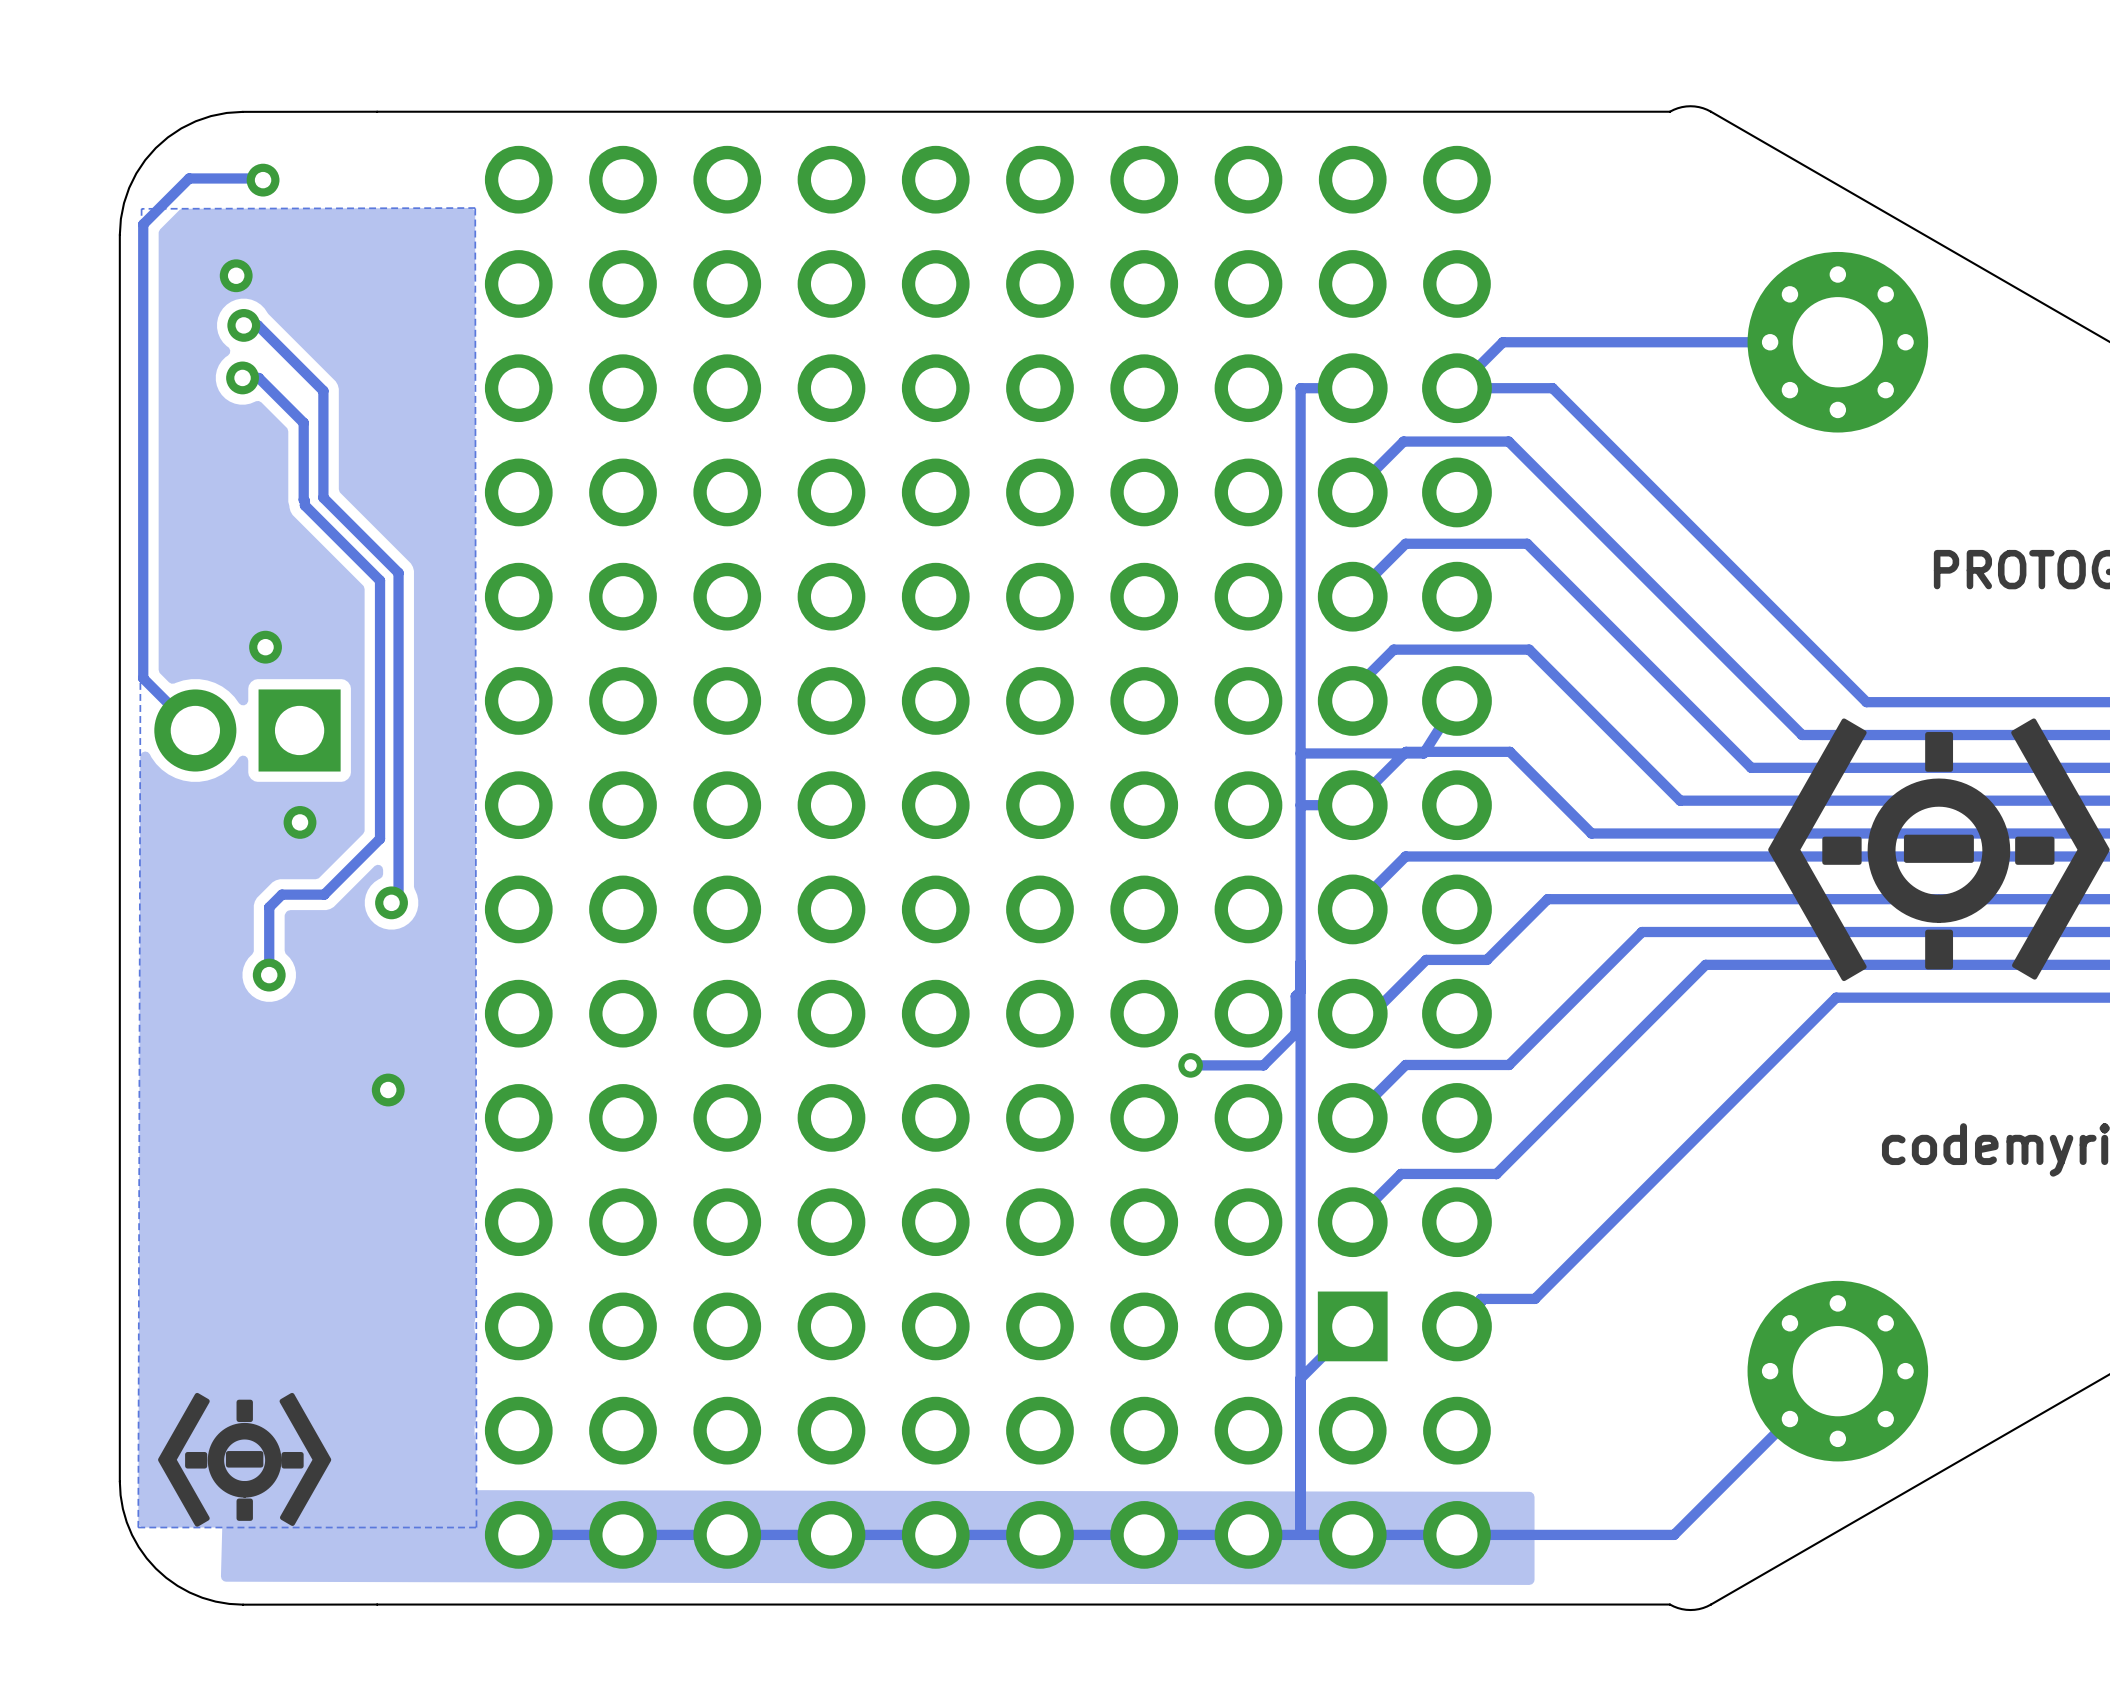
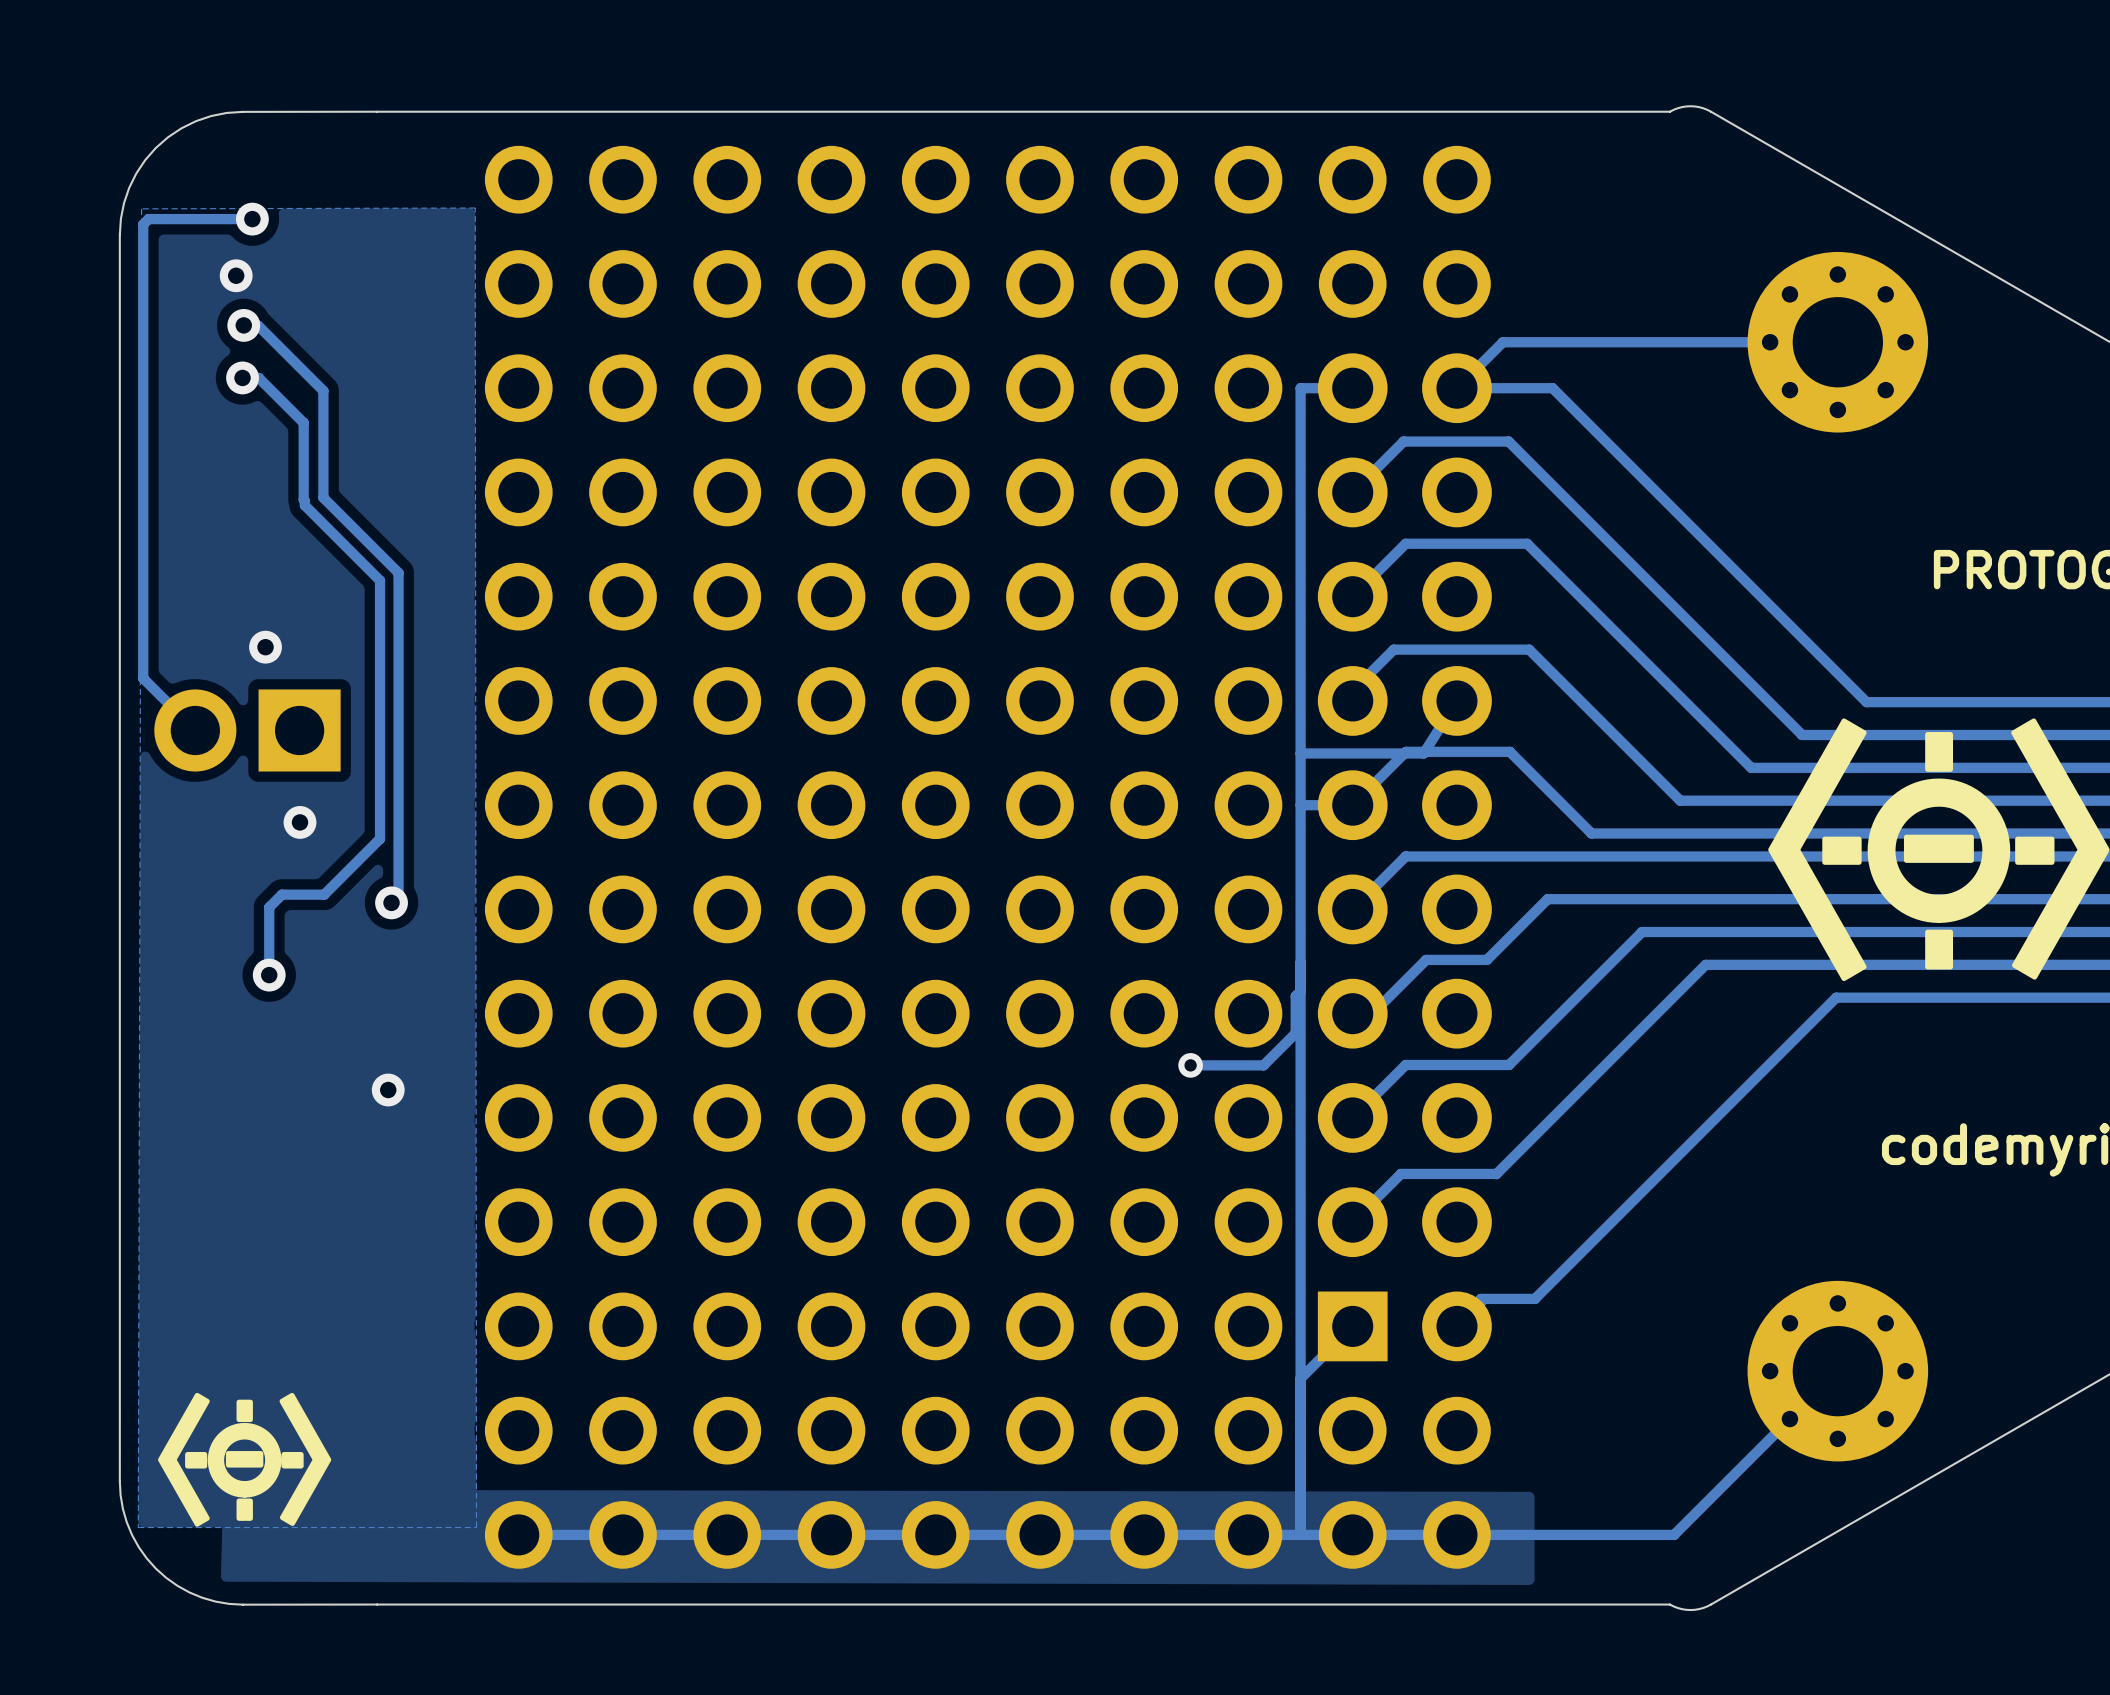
track: (263, 180) (261, 178) (189, 178) (148, 219) -> (252, 219) (148, 219)
via position: (263, 180) -> (252, 219)

